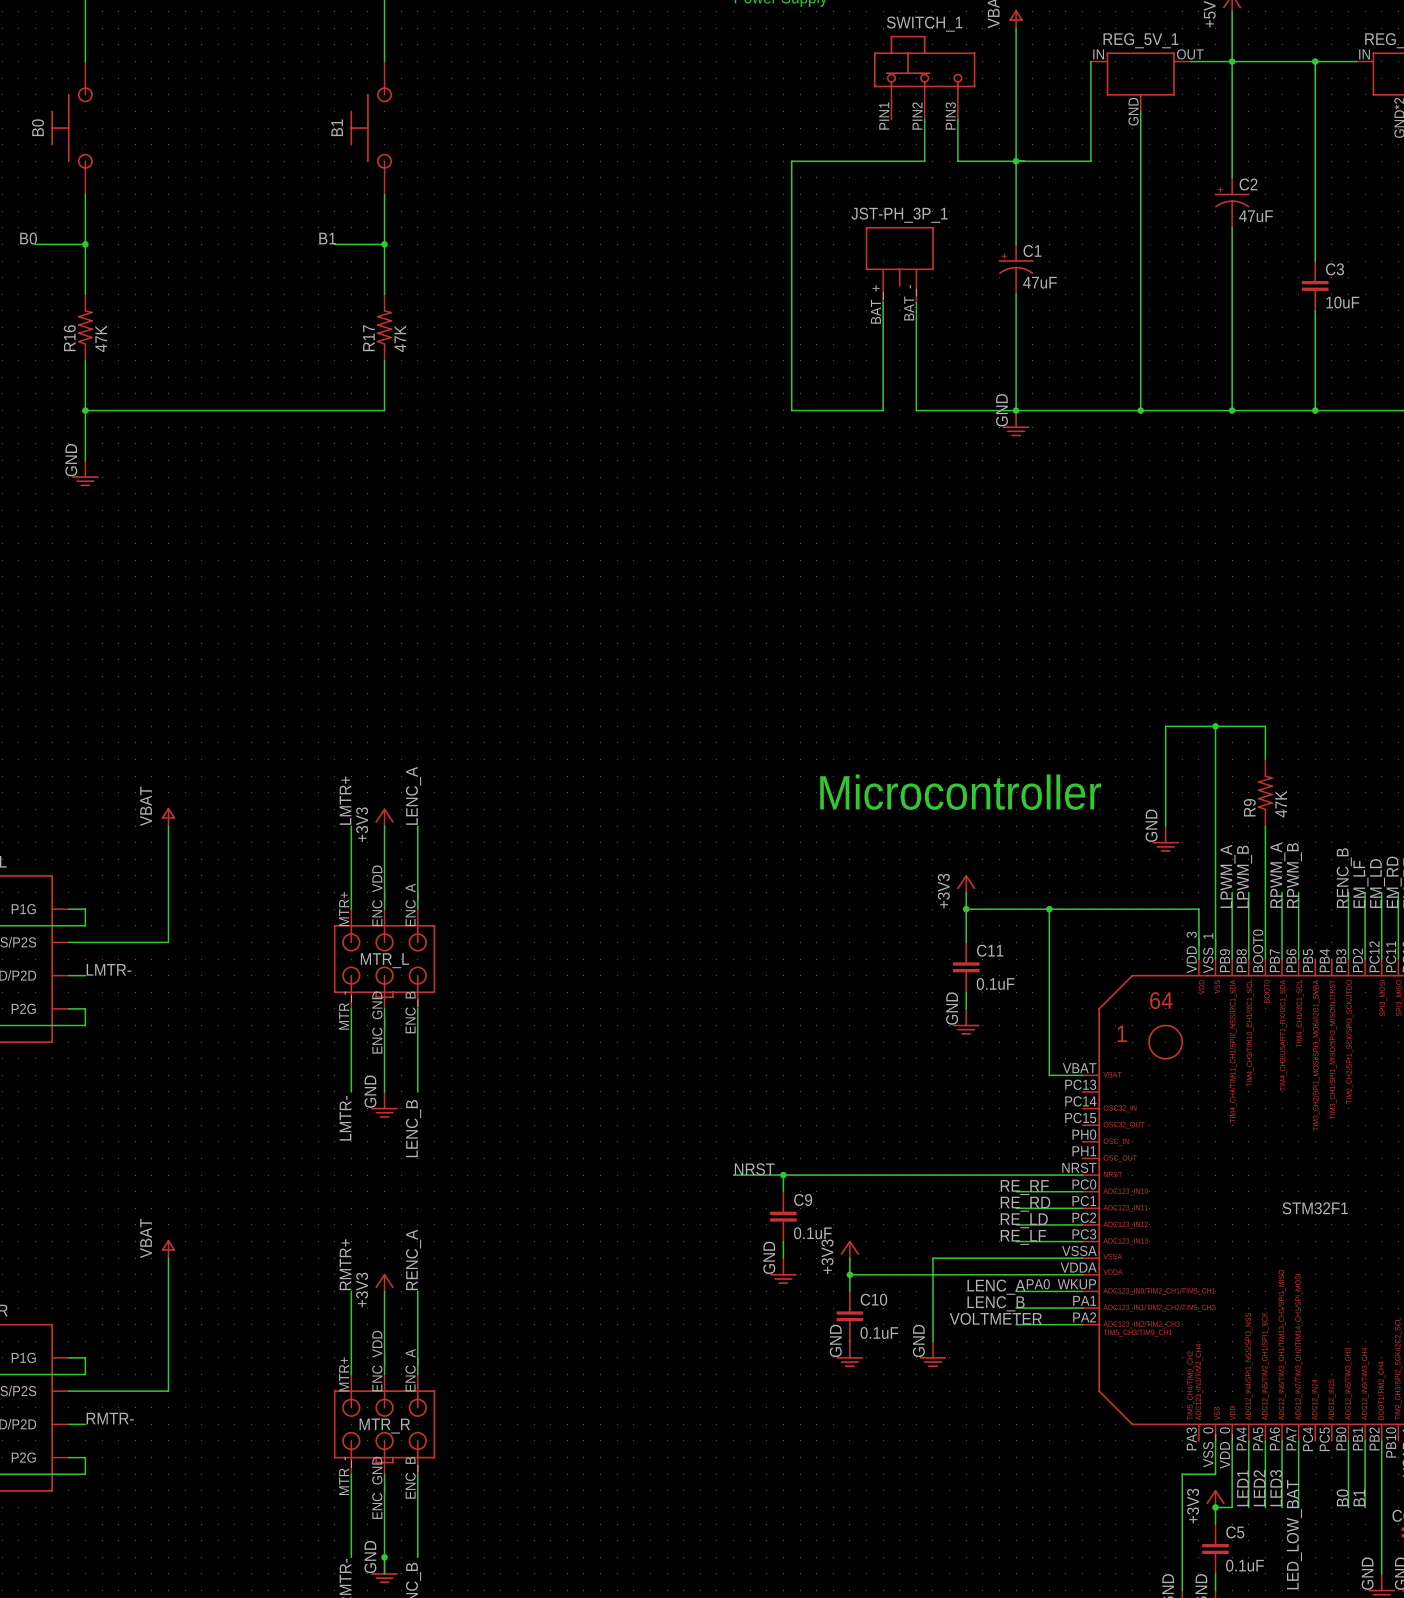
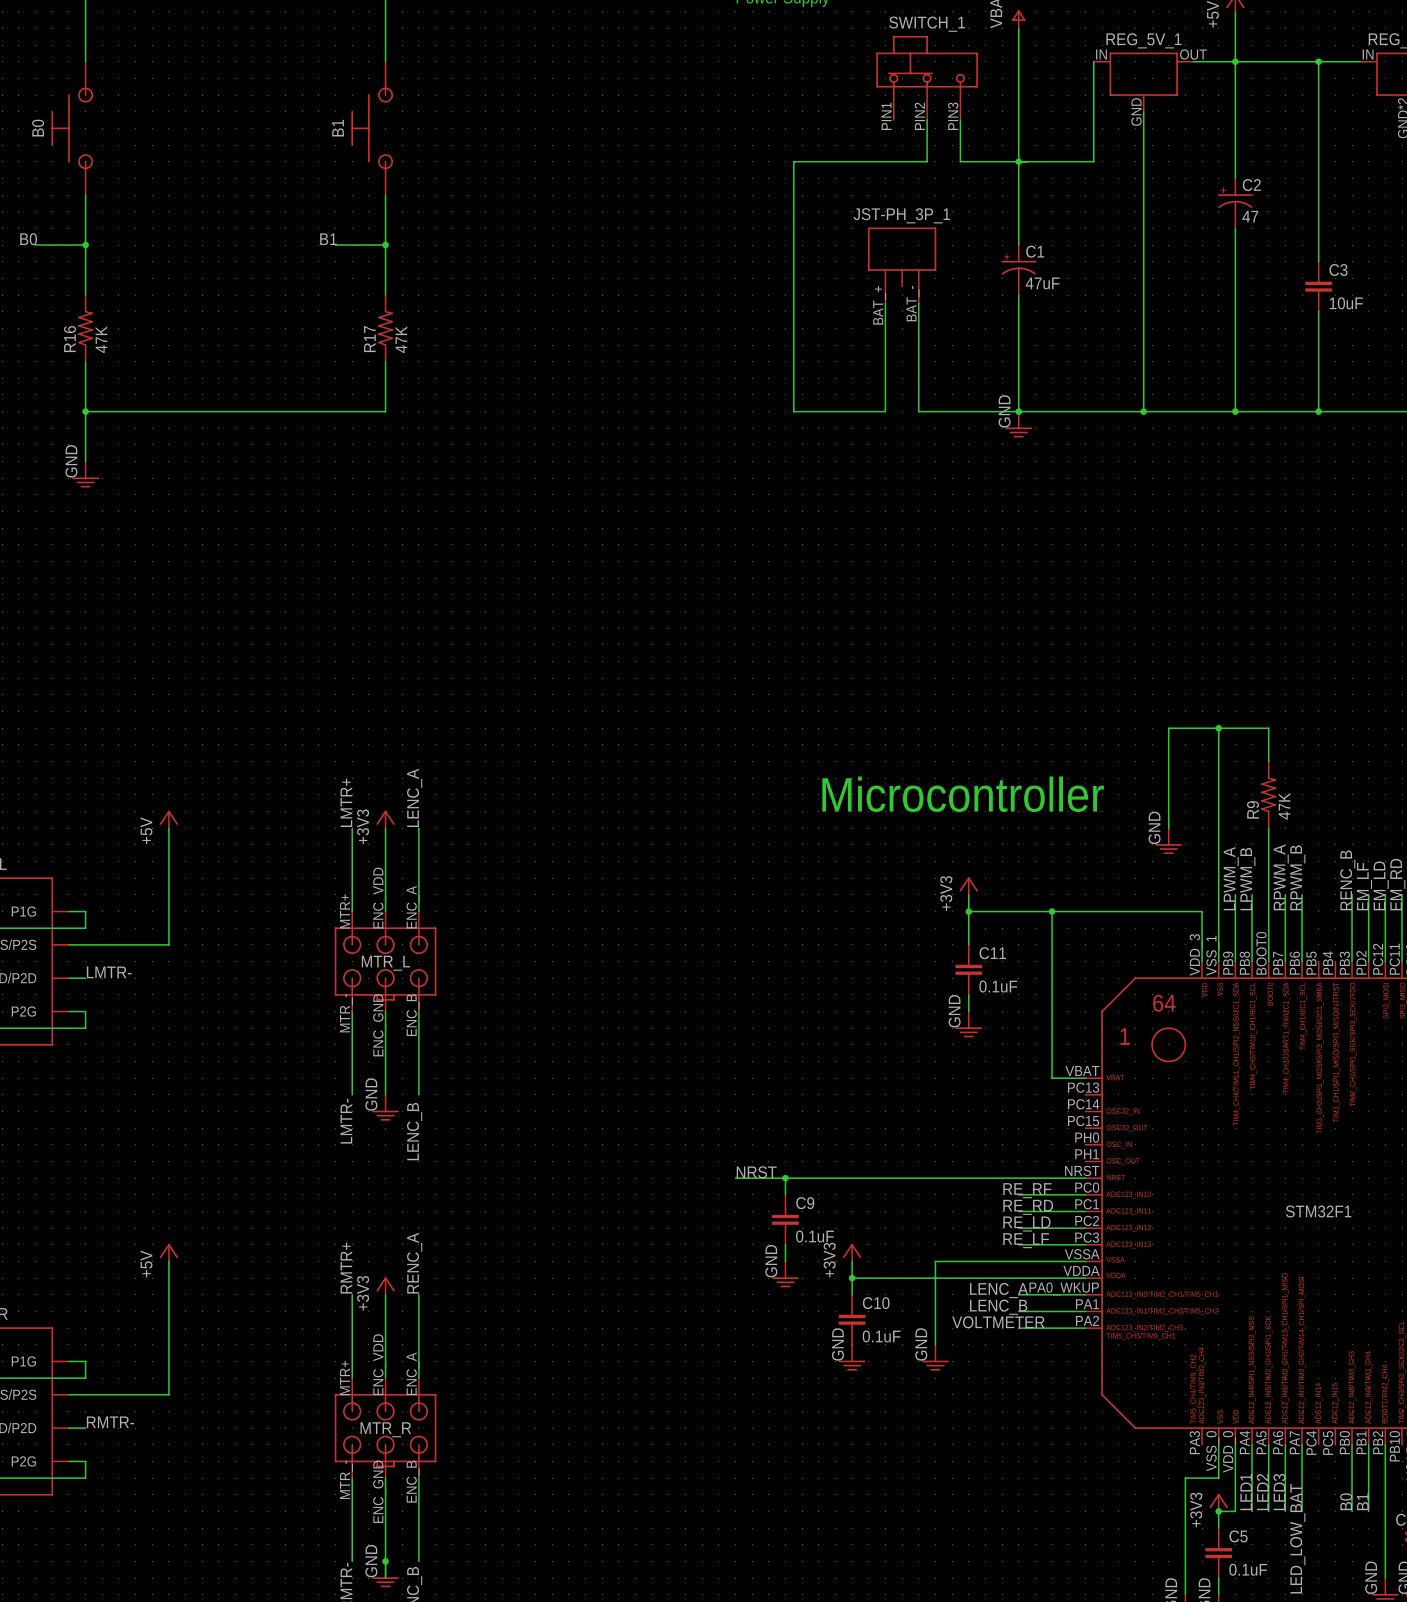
C2 value: 47uF (1256, 216) -> 47 (1250, 216)
power symbol: VBAT (168, 816) -> +5V (168, 819)
power symbol: VBAT (168, 1249) -> +5V (168, 1252)

